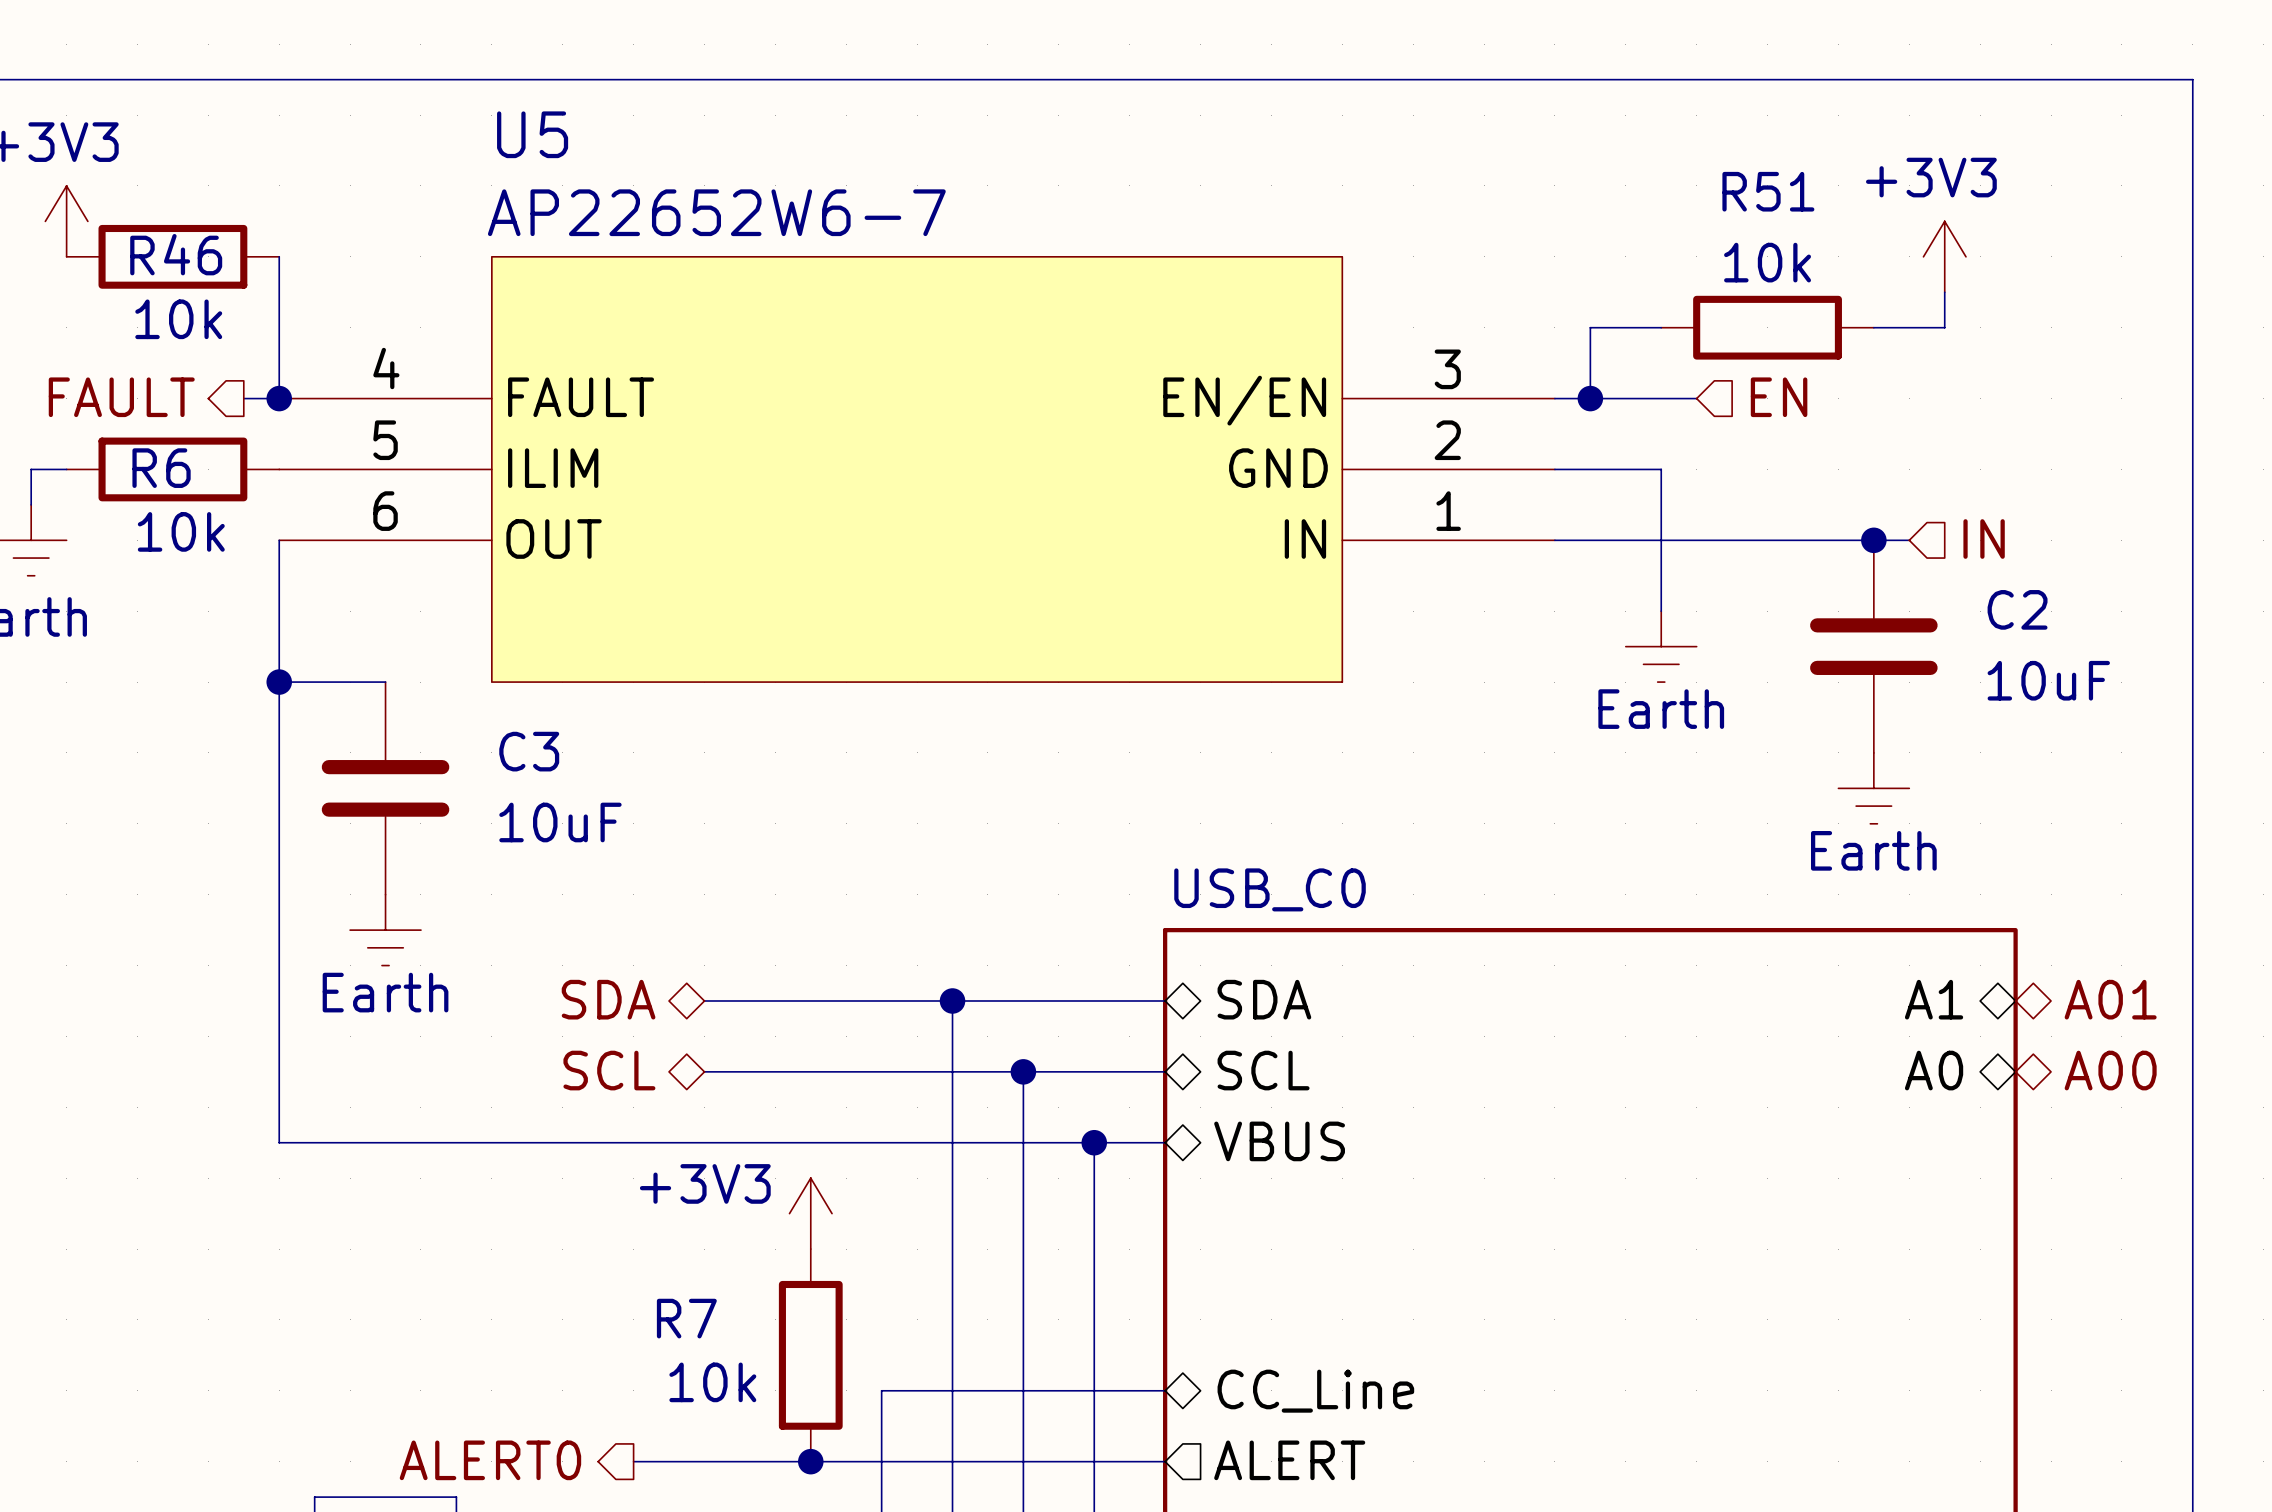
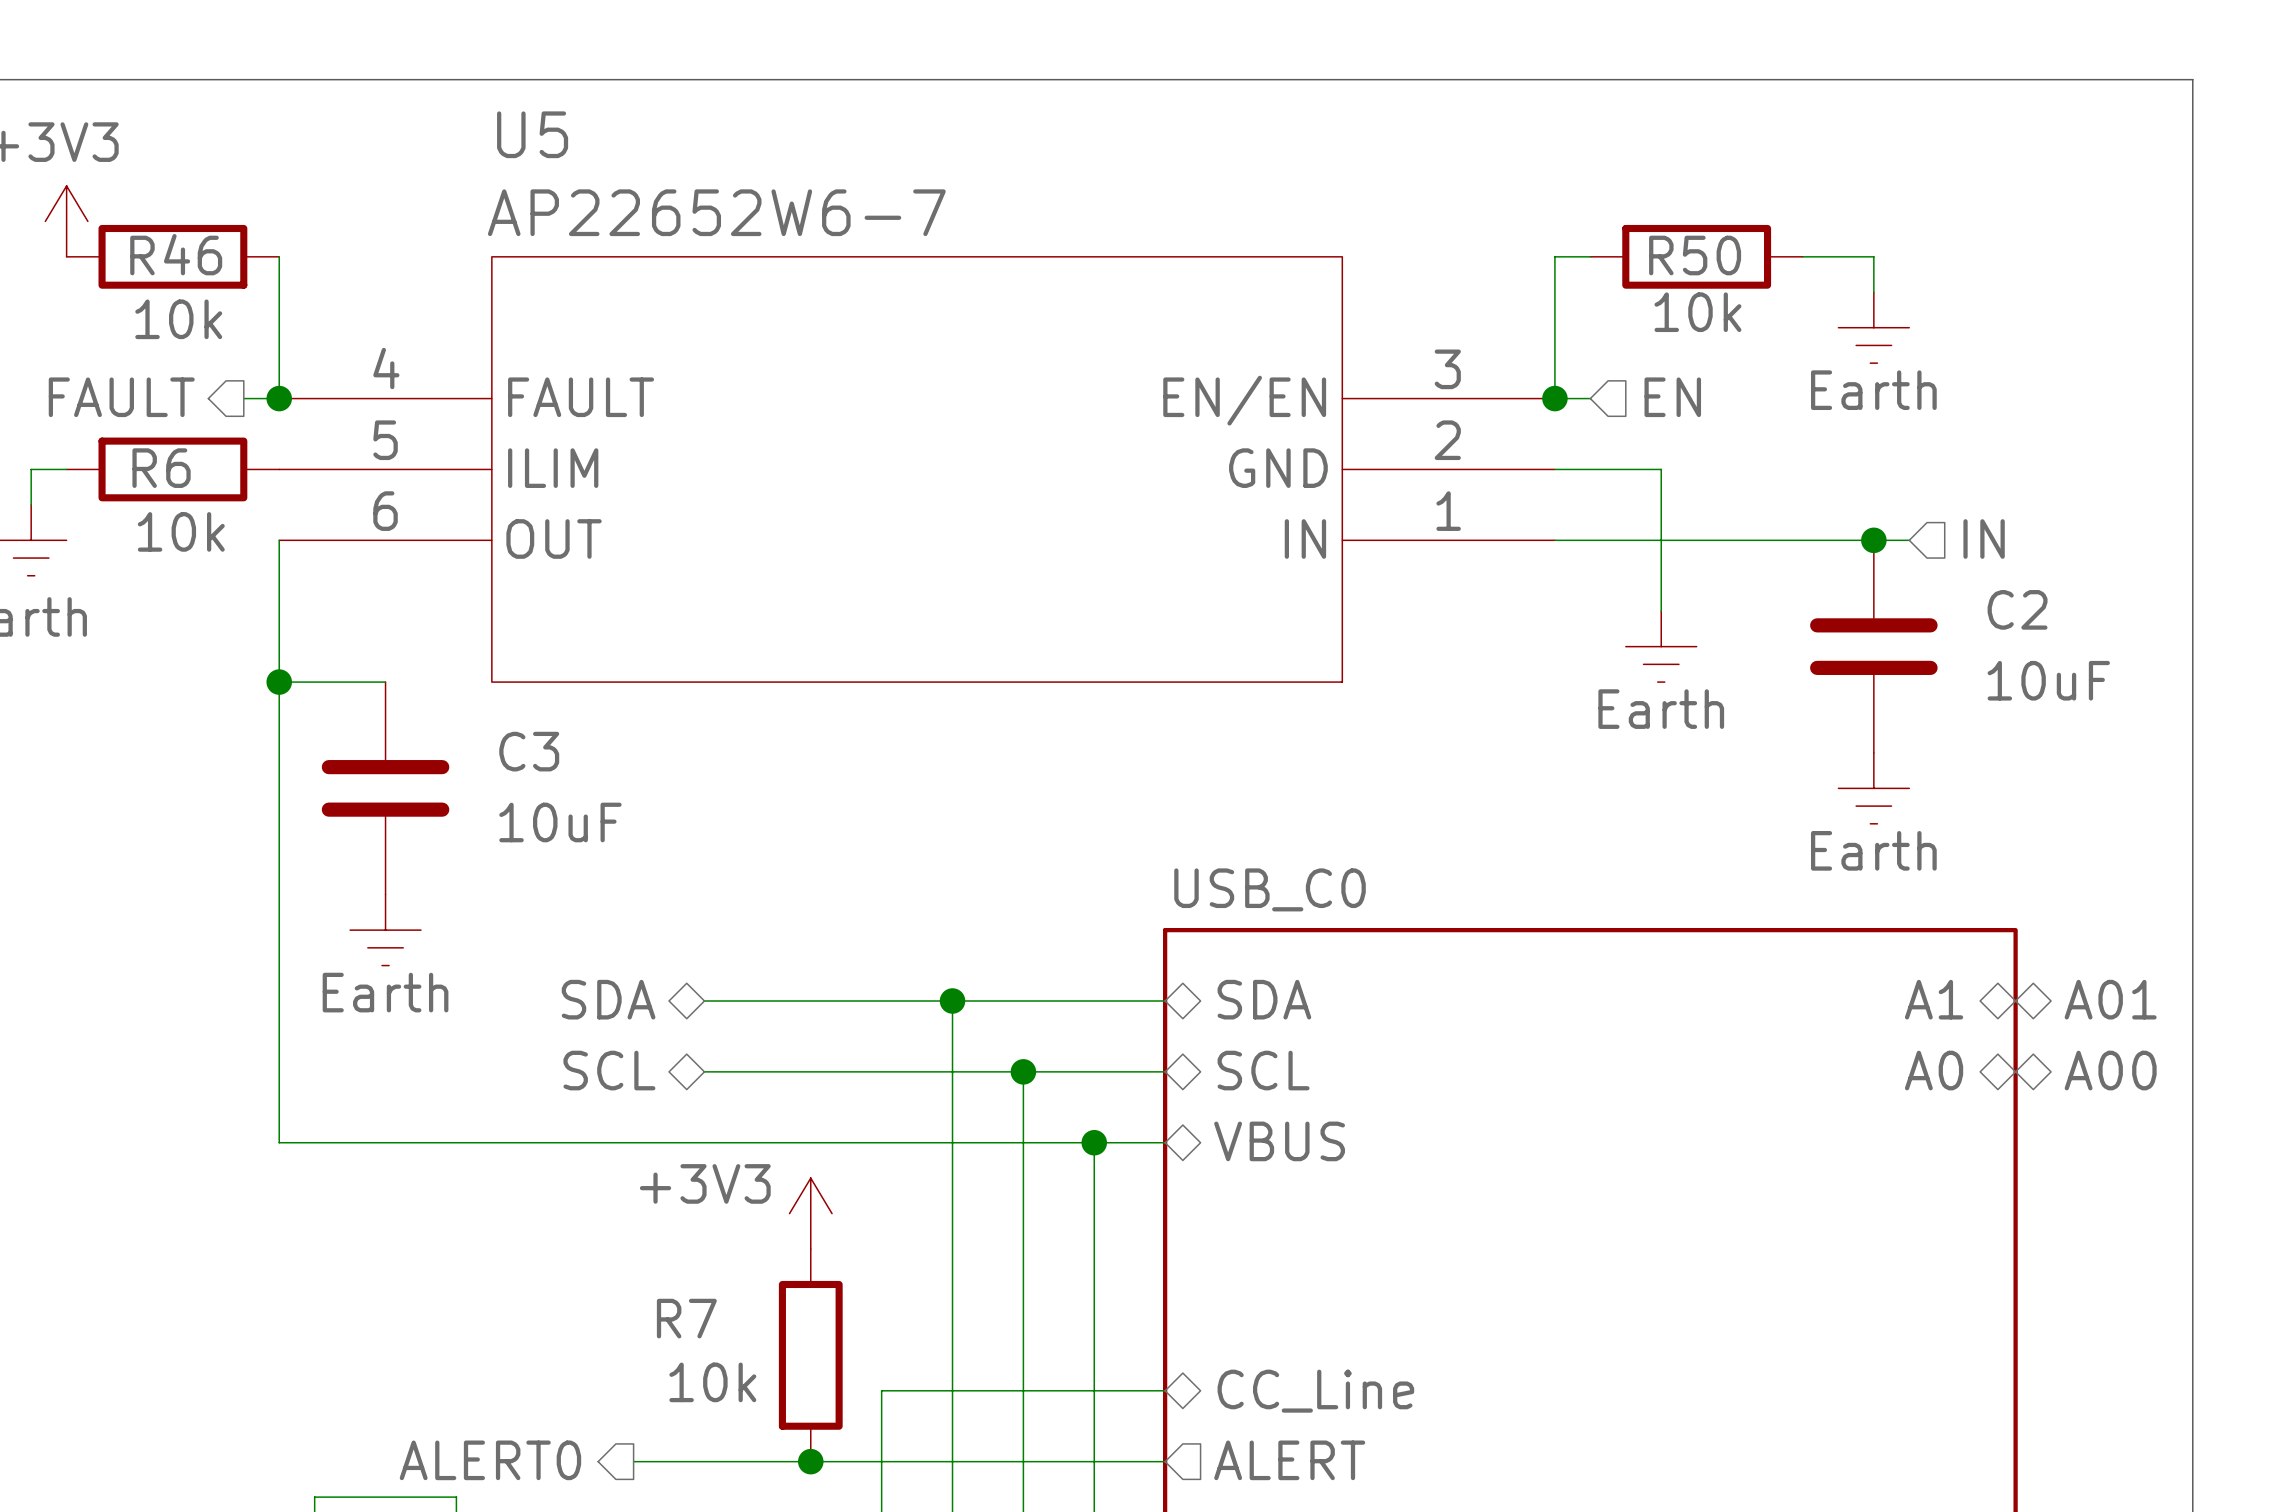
wire: none -> (1590, 256) (1554, 256) (1554, 398)
R50: none -> 10k (1696, 256)
wire: none -> (1802, 256) (1873, 256) (1873, 292)
power symbol: +3V3 (1944, 256) -> none
wire: (1944, 292) (1944, 327) (1873, 327) -> none
wire: (1661, 327) (1590, 327) (1590, 398) (1696, 398) -> none
R51: 10k (1767, 327) -> none
power symbol: none -> Earth (1873, 327)
hierarchical label position: EN (1779, 397) -> EN (1672, 397)
junction position: (1590, 398) -> (1554, 398)

